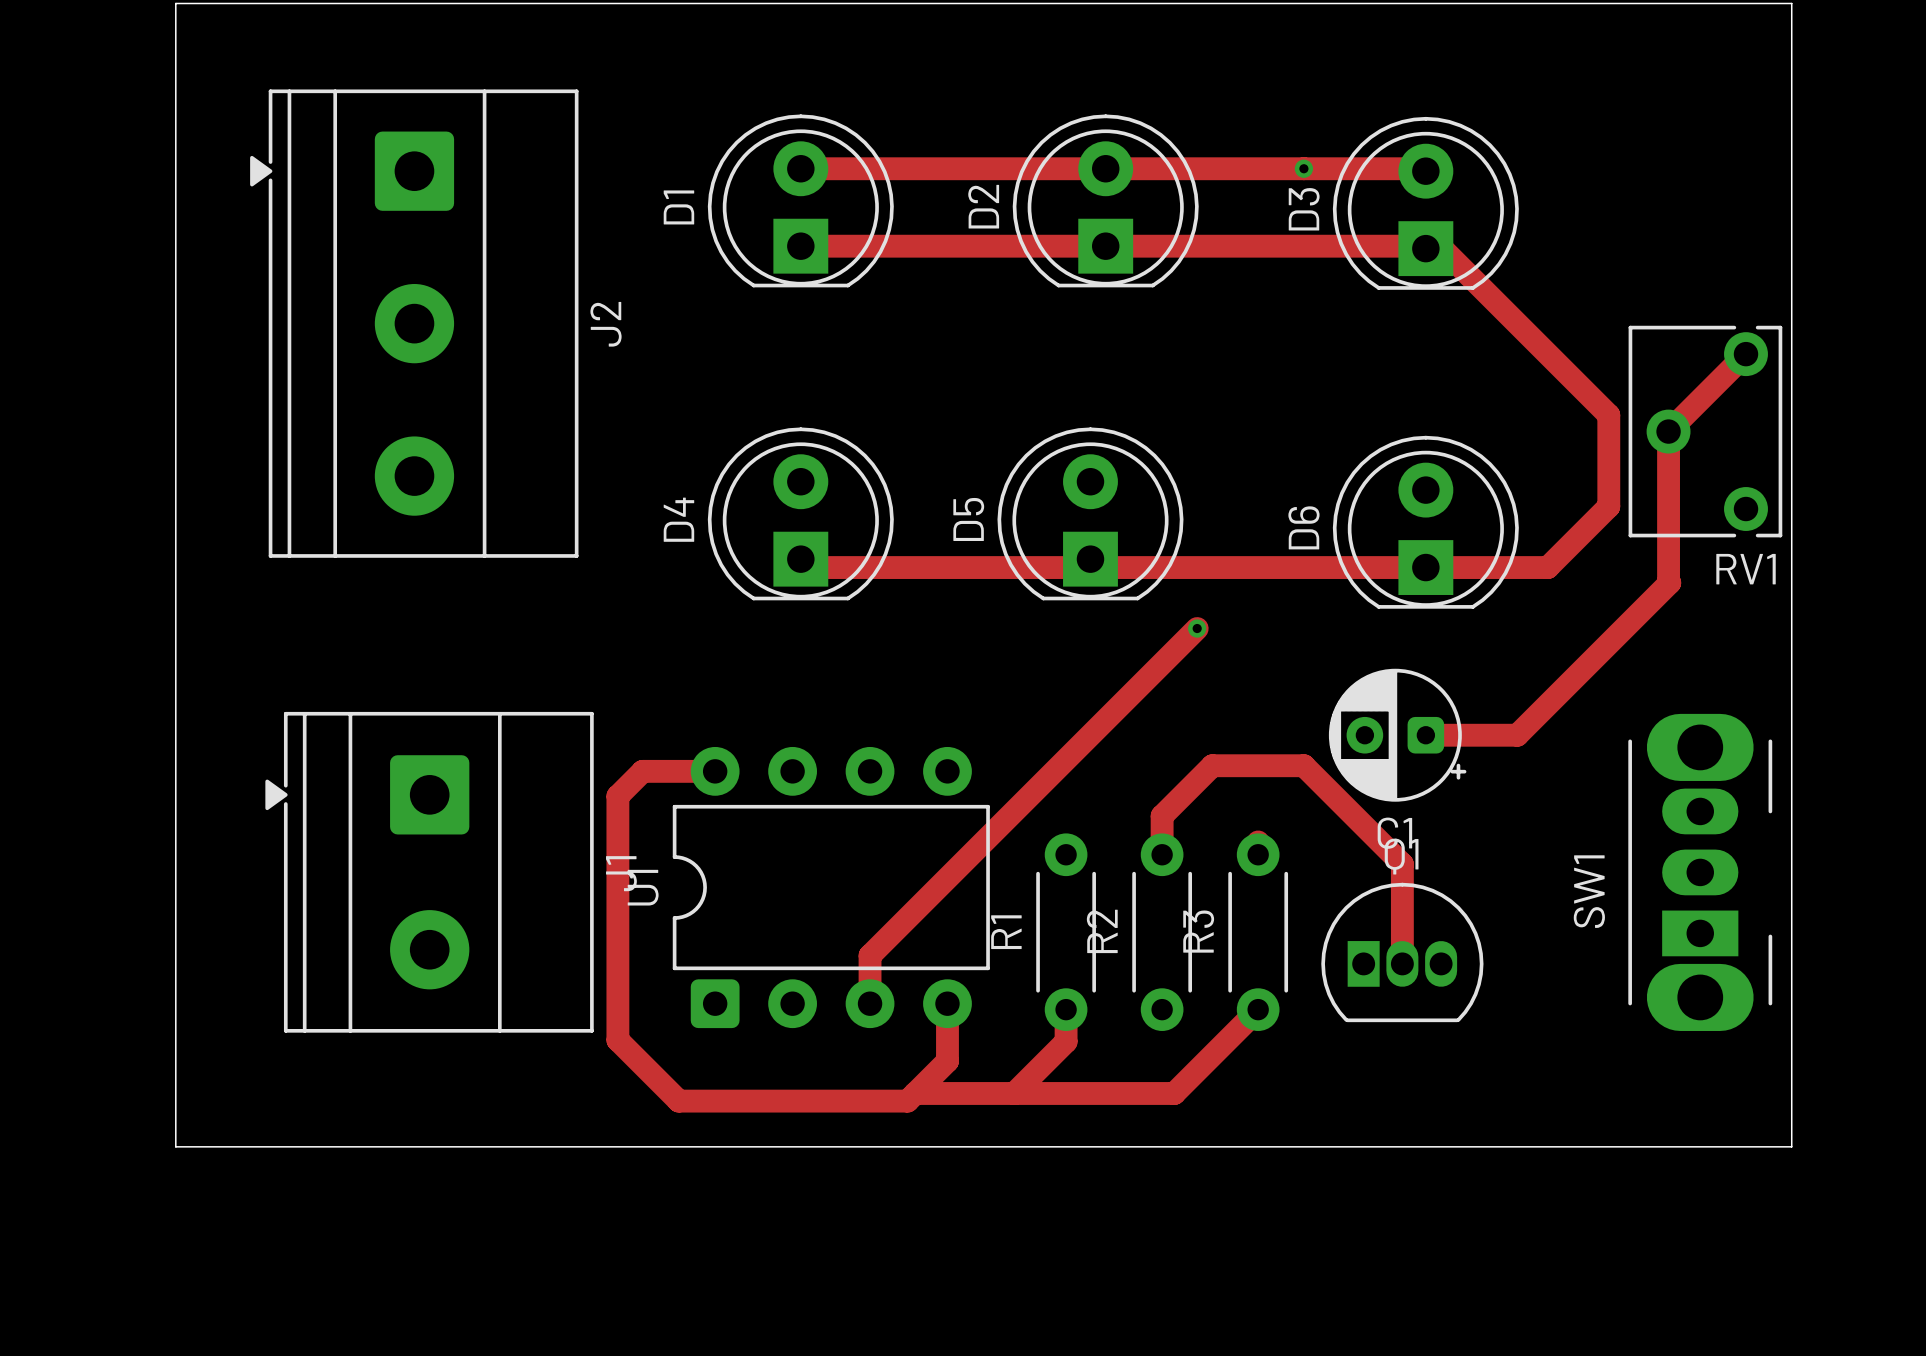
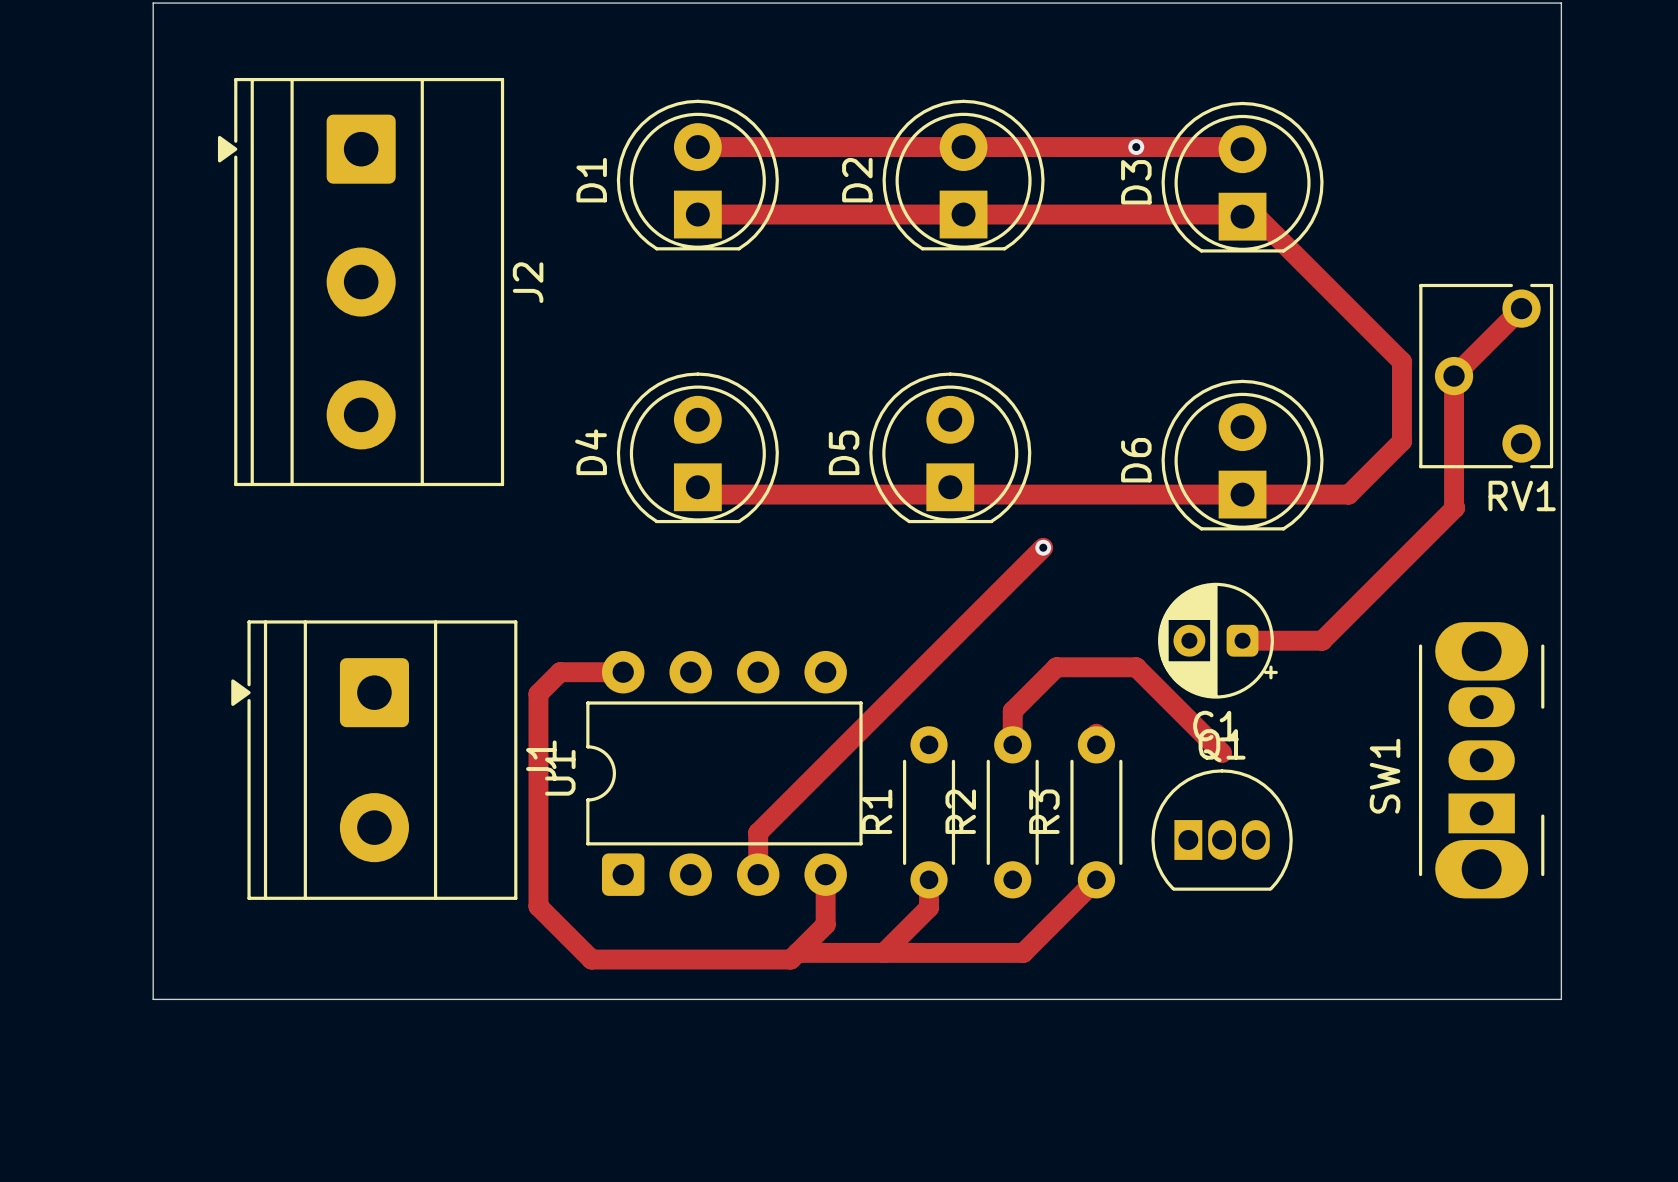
track: (1402, 864) (1402, 963) -> none

